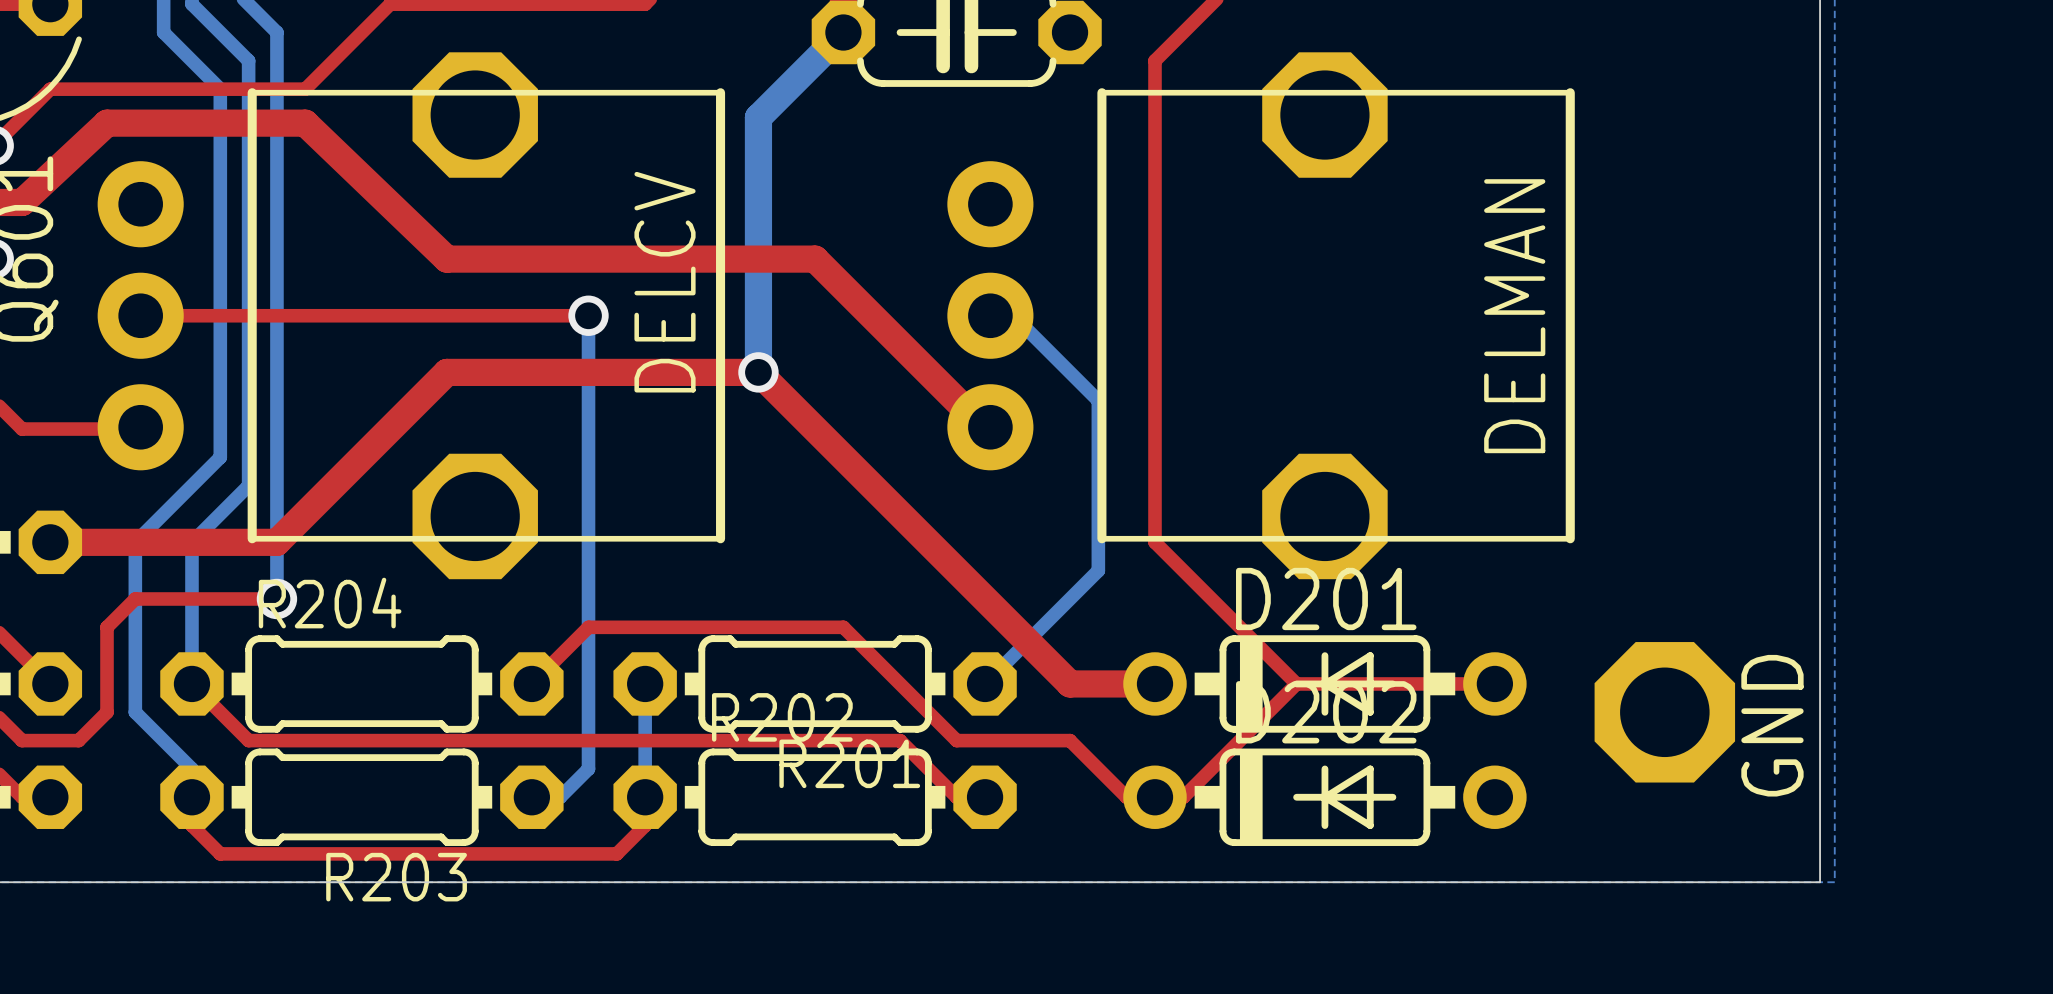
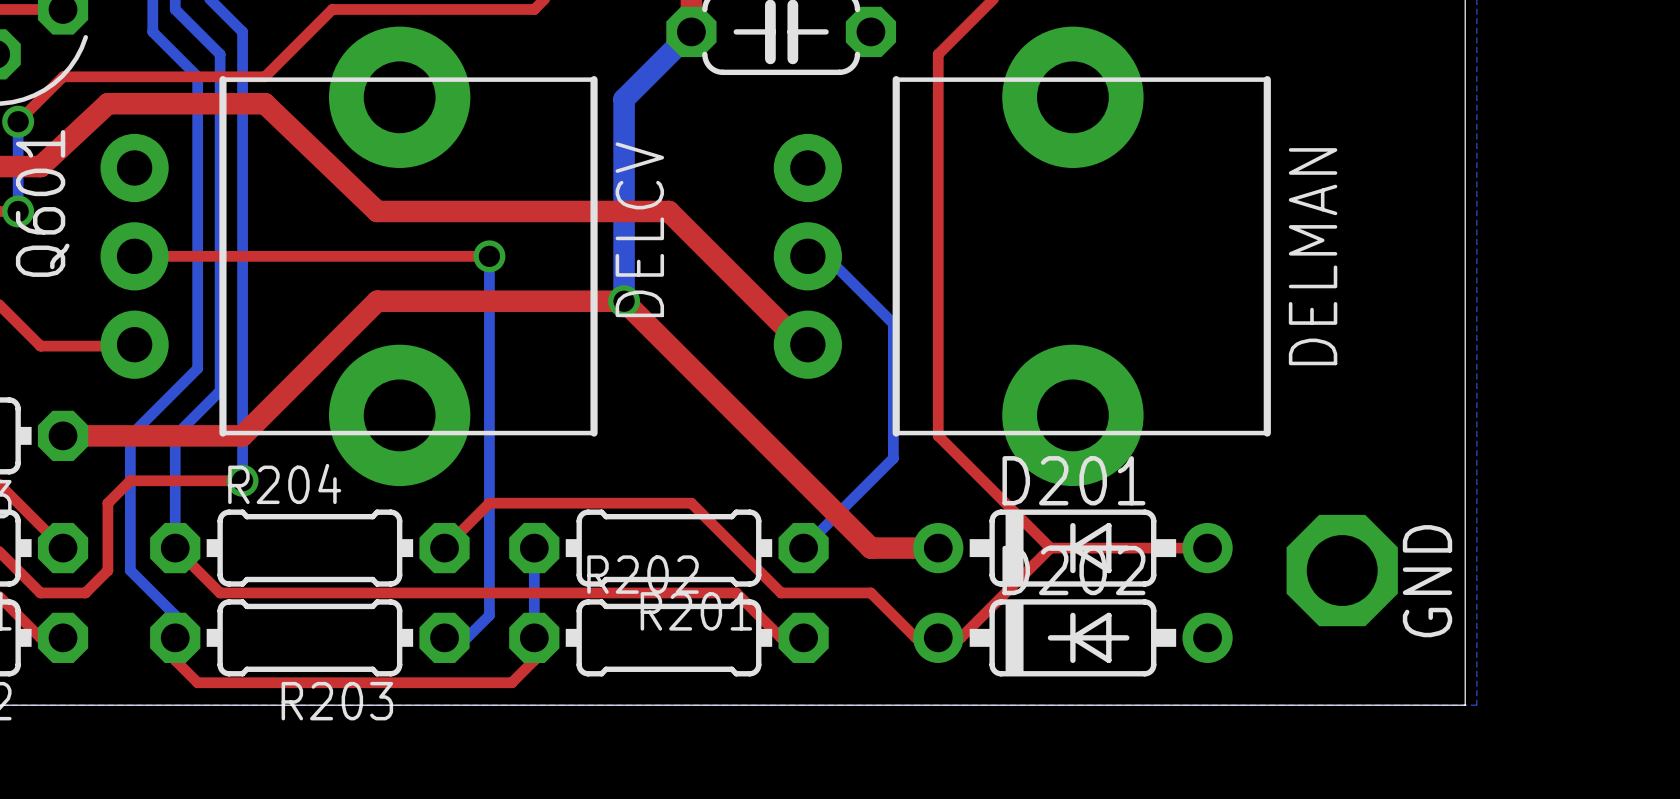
DELCV footprint: [97, 52, 726, 580] -> [100, 26, 598, 487]
DELMAN footprint: [947, 52, 1575, 580] -> [773, 26, 1271, 487]
DELCV name position: DELCV (665, 282) -> DELCV (639, 229)
DELMAN name position: DELMAN (1514, 316) -> DELMAN (1313, 256)

